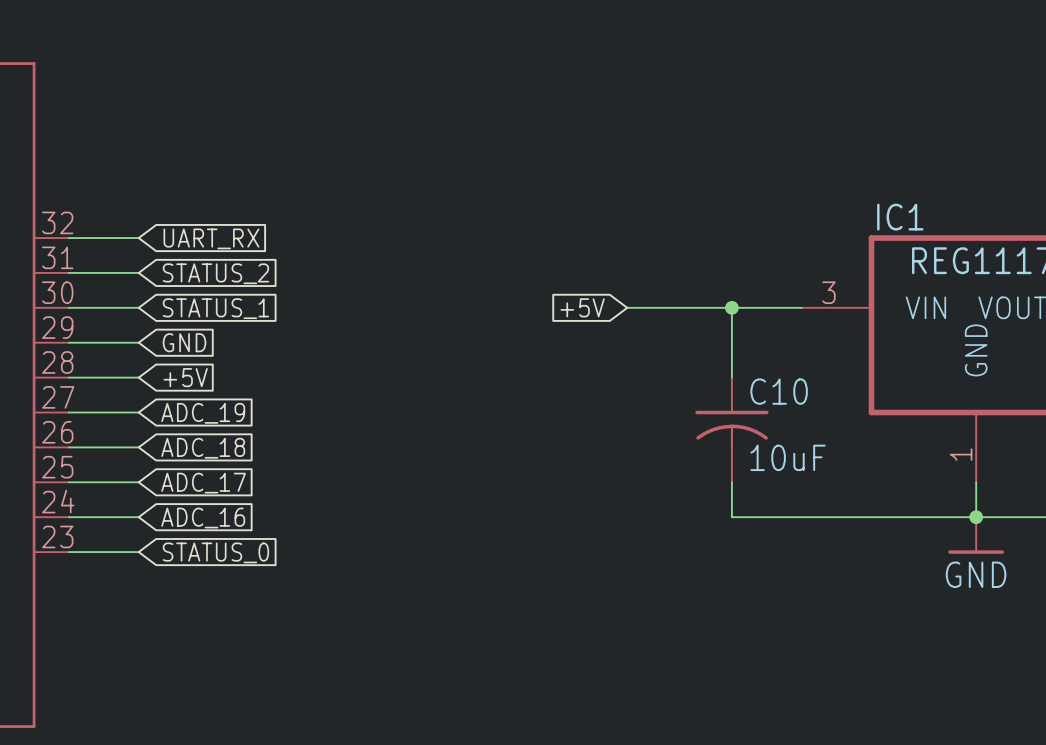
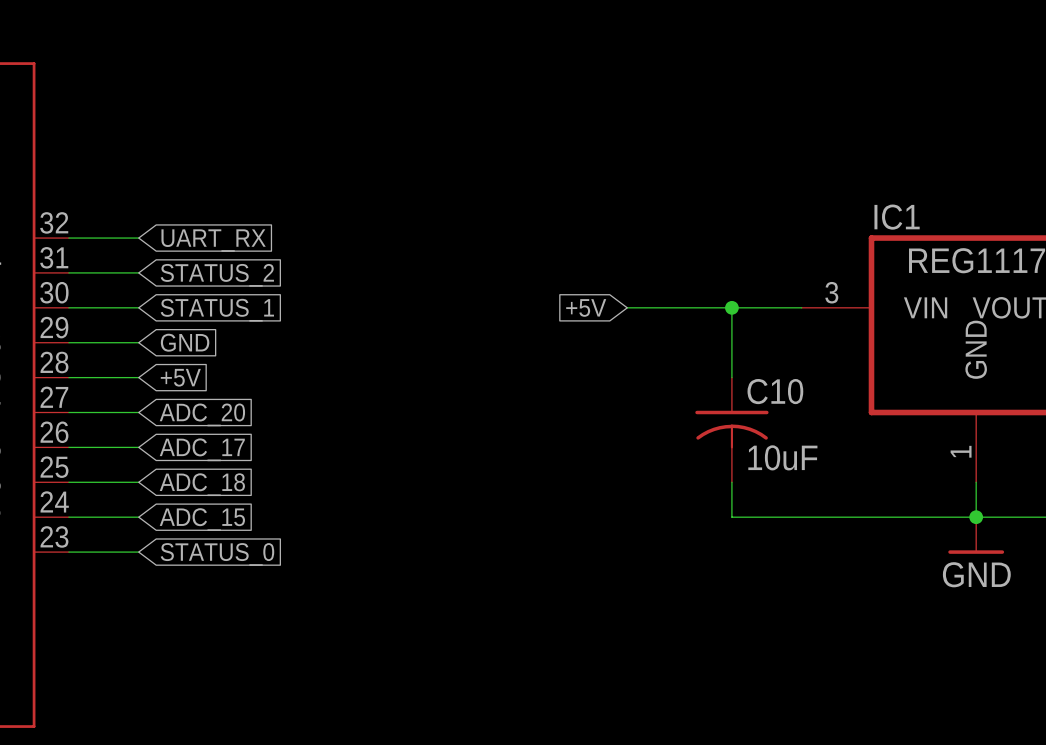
global label: ADC_19 (203, 413) -> ADC_20 (202, 414)
global label: ADC_18 (203, 448) -> ADC_17 (202, 449)
global label: ADC_17 (203, 483) -> ADC_18 (202, 484)
global label: ADC_16 (203, 518) -> ADC_15 (202, 519)

